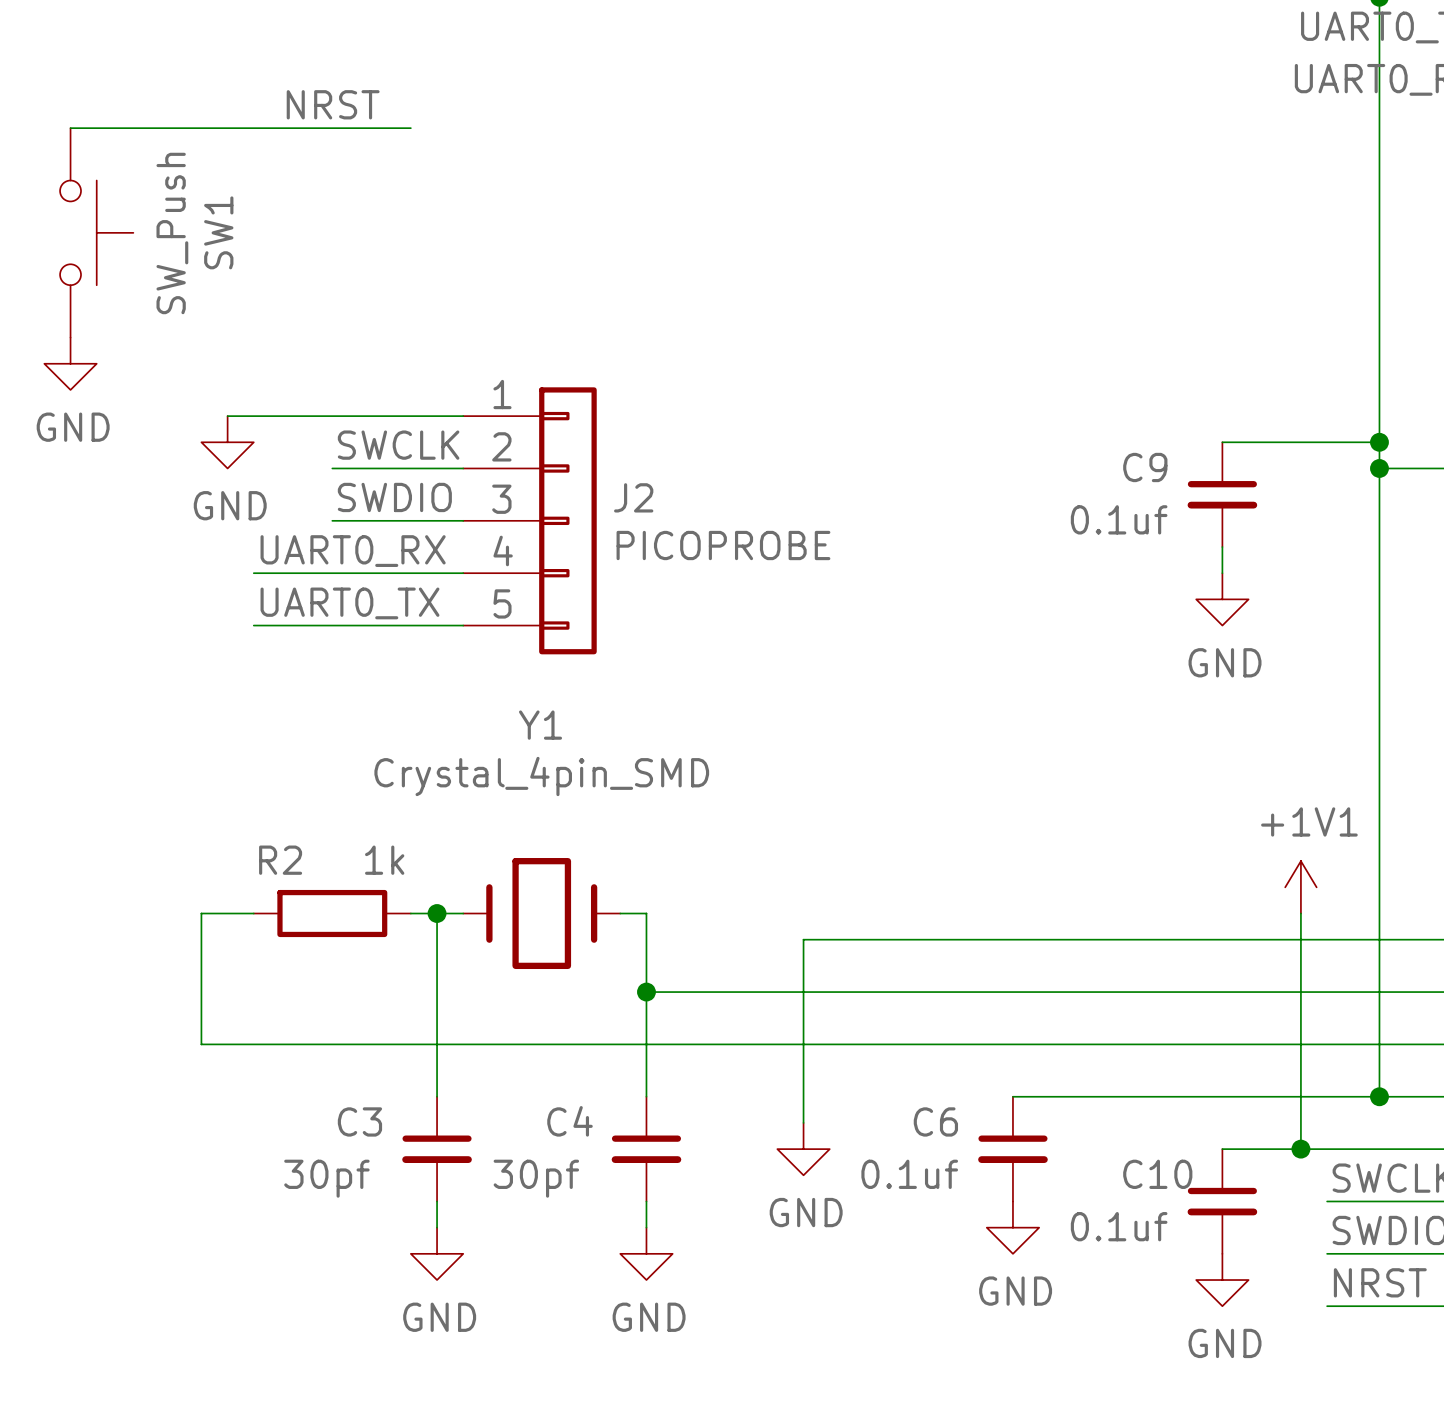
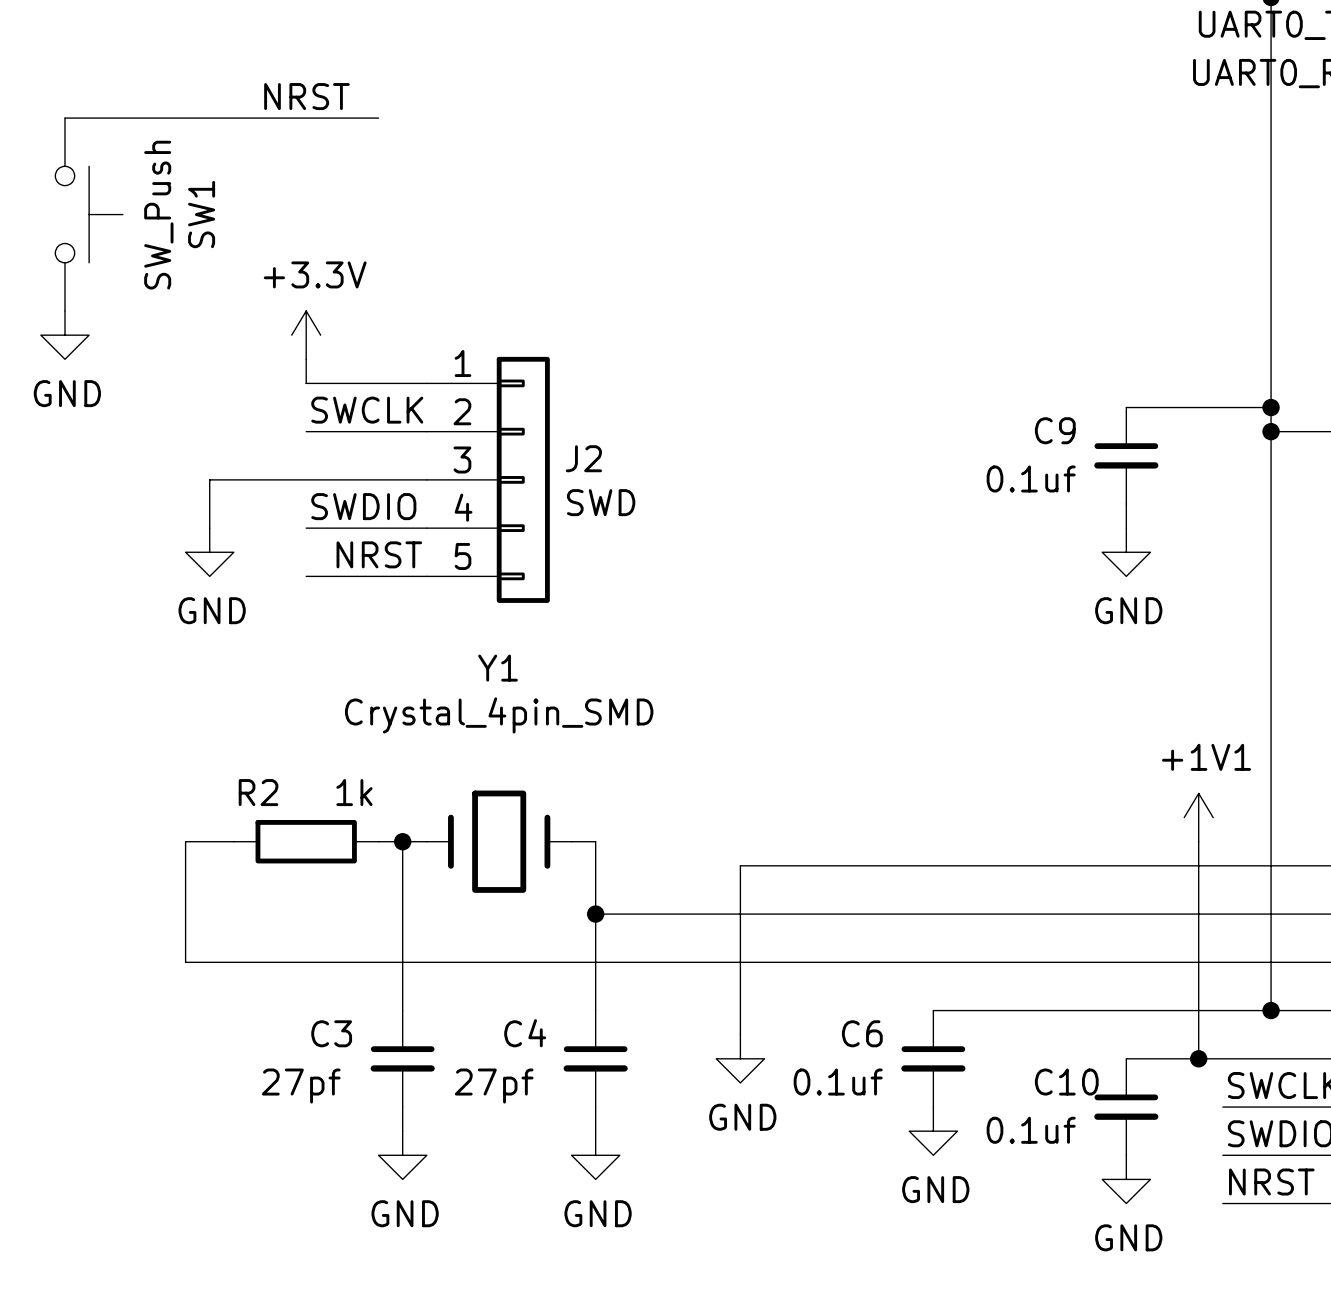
power symbol: none -> +3.3V (306, 335)
wire: (227, 416) (332, 416) -> (306, 359) (306, 383)
power symbol position: GND (227, 442) -> GND (209, 552)
label position: SWDIO (394, 497) -> SWDIO (363, 506)
wire: none -> (306, 479) (209, 479) (209, 528)
J2 value: PICOPROBE (723, 545) -> SWD (601, 502)
label: UART0_RX (353, 551) -> none
wire: (253, 573) (332, 573) -> none
label: none -> NRST (379, 554)
label: UART0_TX (349, 603) -> none
wire: (253, 625) (332, 625) -> none
C3 value: 30pf (326, 1178) -> 27pf (301, 1086)
C4 value: 30pf (536, 1178) -> 27pf (494, 1086)

